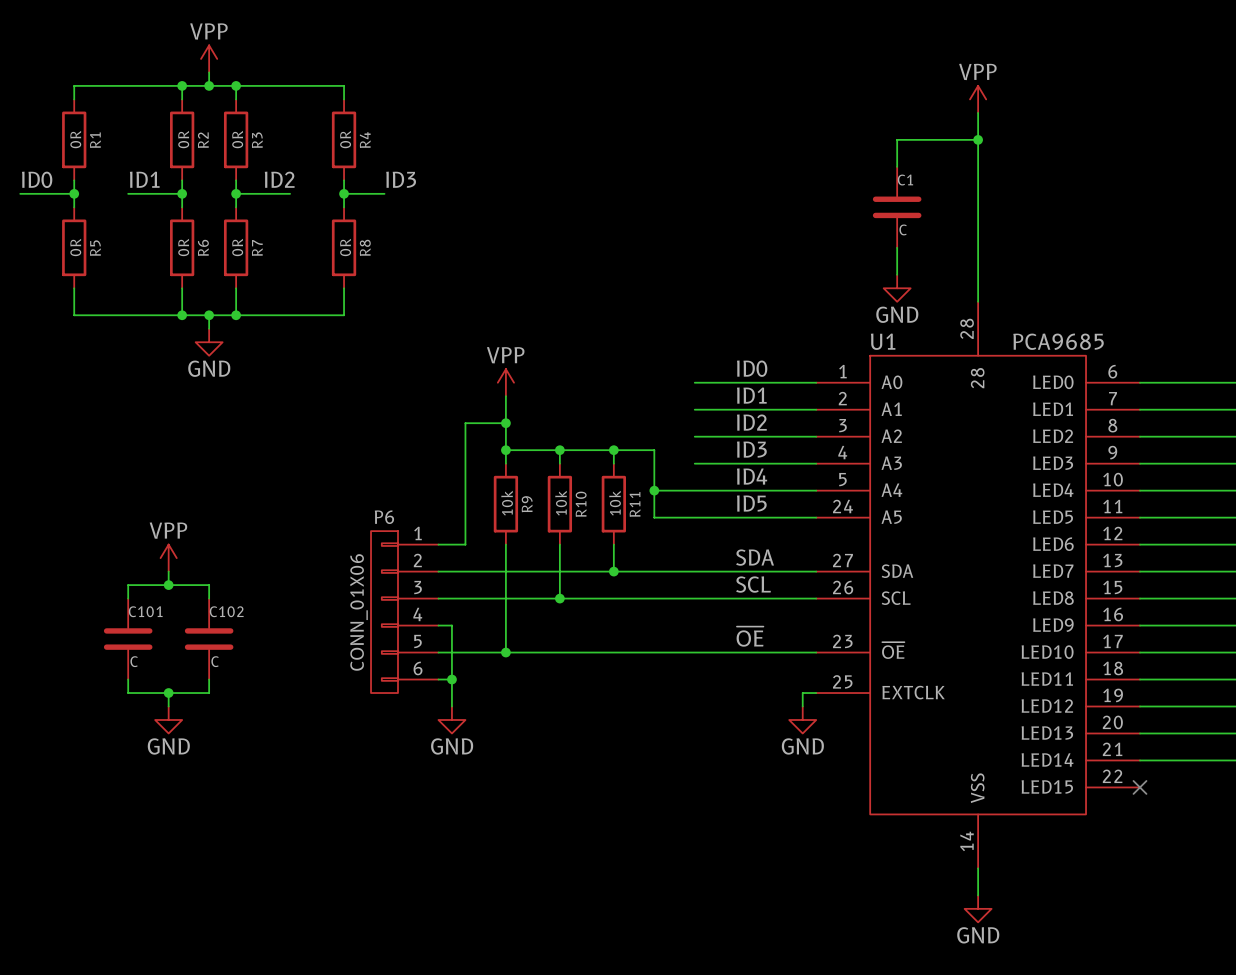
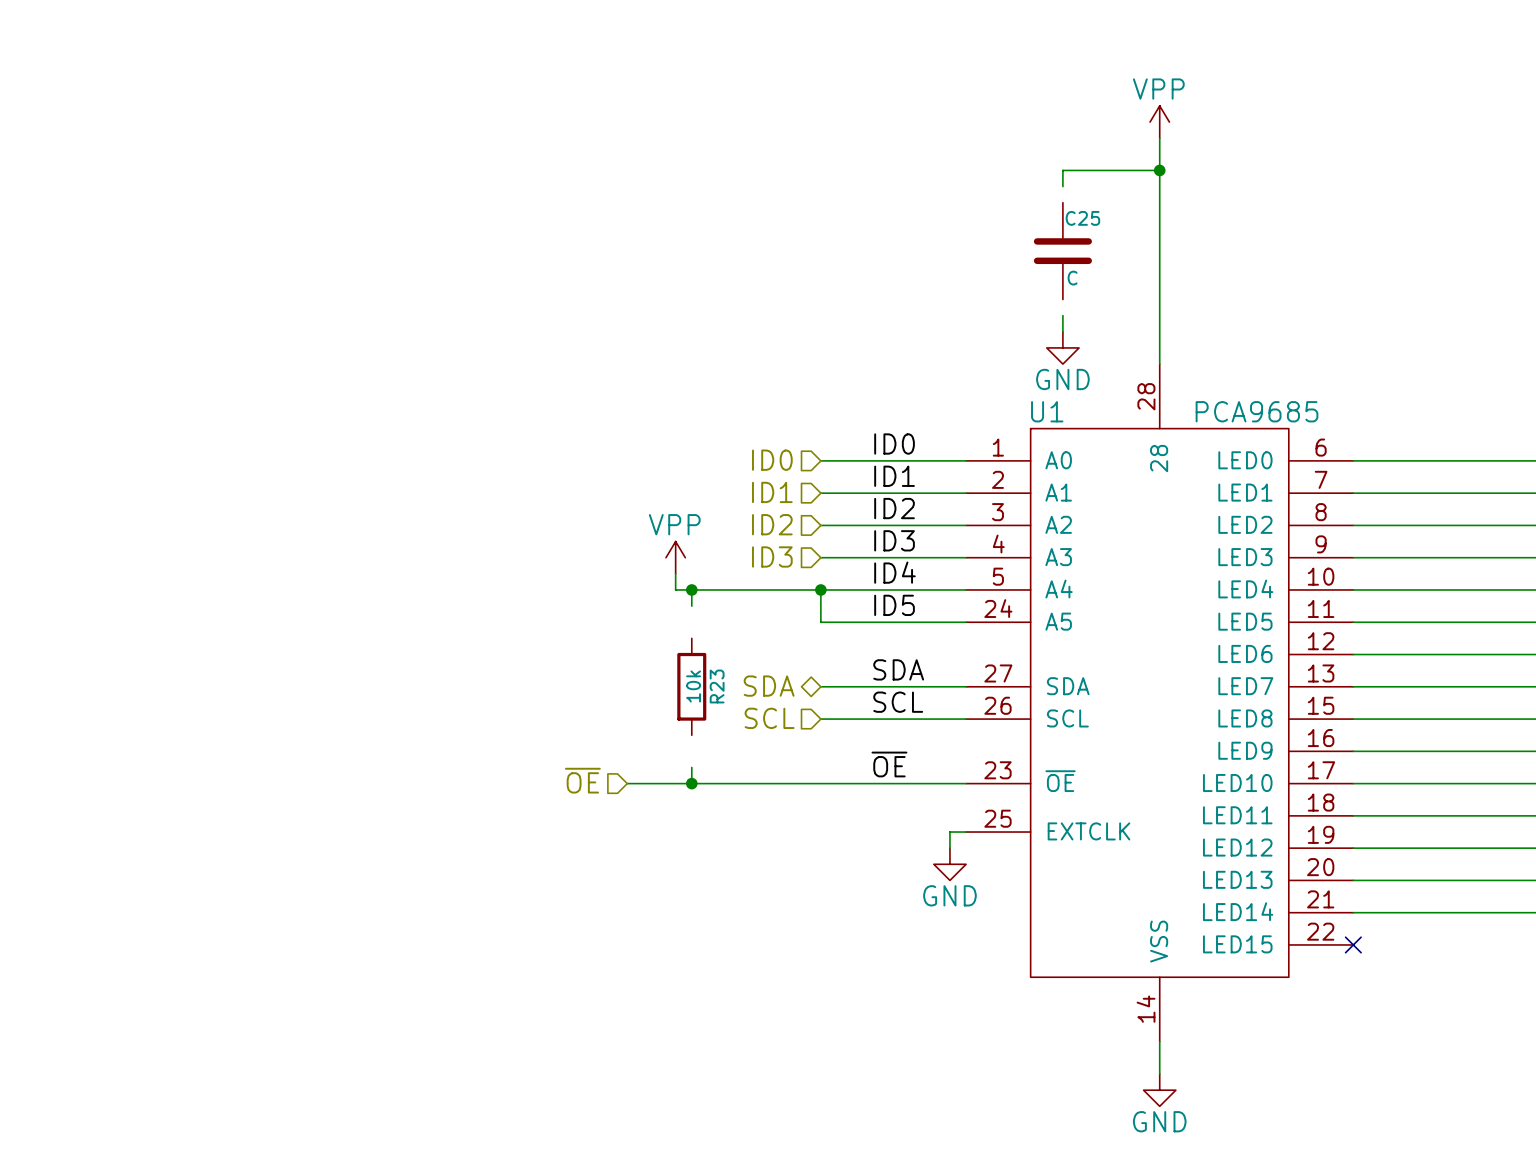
power symbol: VPP (209, 58) -> none
wire: (209, 72) (209, 85) -> none
wire: (182, 85) (182, 99) -> none
junction: (182, 85) -> none
junction: (209, 85) -> none
wire: (236, 85) (236, 99) -> none
junction: (236, 85) -> none
wire: (74, 99) (74, 85) (344, 85) (344, 99) -> none
R1: 0R (74, 139) -> none
R2: 0R (182, 139) -> none
R3: 0R (236, 139) -> none
R4: 0R (344, 139) -> none
wire: (897, 153) (897, 166) -> none
label: ID0 (37, 179) -> none
label: ID1 (144, 179) -> none
label: ID2 (279, 179) -> none
label: ID3 (401, 179) -> none
wire: (74, 180) (74, 207) -> none
wire: (182, 180) (182, 207) -> none
wire: (236, 180) (236, 207) -> none
wire: (344, 180) (344, 207) -> none
C1 name: C1 (905, 180) -> C25 (1082, 218)
wire: (20, 193) (74, 193) -> none
junction: (74, 193) -> none
wire: (128, 193) (182, 193) -> none
junction: (182, 193) -> none
wire: (236, 193) (290, 193) -> none
junction: (236, 193) -> none
wire: (344, 193) (384, 193) -> none
junction: (344, 193) -> none
R5: 0R (74, 247) -> none
R6: 0R (182, 247) -> none
R7: 0R (236, 247) -> none
R8: 0R (344, 247) -> none
wire: (897, 247) (897, 261) -> none
wire: (74, 288) (74, 315) (344, 315) (344, 288) -> none
wire: (182, 288) (182, 315) -> none
wire: (236, 288) (236, 315) -> none
junction: (182, 315) -> none
wire: (209, 315) (209, 328) -> none
junction: (209, 315) -> none
junction: (236, 315) -> none
power symbol: GND (209, 342) -> none
power symbol position: VPP (505, 382) -> VPP (675, 557)
hierarchical label: none -> ID0 (772, 460)
wire: (505, 396) (505, 463) -> none
hierarchical label: none -> ID1 (772, 492)
wire: (505, 423) (465, 423) (465, 544) (438, 544) -> none
junction: (505, 423) -> none
hierarchical label: none -> ID2 (772, 524)
wire: (505, 450) (654, 450) (654, 517) (694, 517) -> (820, 589) (820, 622)
junction: (505, 450) -> none
wire: (559, 450) (559, 463) -> (691, 589) (691, 606)
junction: (559, 450) -> none
wire: (613, 450) (613, 463) -> (691, 767) (691, 783)
junction: (613, 450) -> none
hierarchical label: none -> ID3 (772, 556)
wire: none -> (675, 573) (675, 589) (772, 589)
junction: none -> (691, 589)
junction: (654, 490) -> none
junction: none -> (820, 589)
R9: 10k (505, 504) -> none
R10: 10k (559, 504) -> none
R11: 10k (613, 504) -> none
wire: (505, 544) (505, 652) -> none
wire: (559, 544) (559, 598) -> none
wire: (613, 544) (613, 571) -> none
power symbol: VPP (168, 558) -> none
wire: (168, 571) (168, 585) -> none
wire: (438, 571) (694, 571) -> none
R23: none -> 10k (691, 686)
junction: (613, 571) -> none
hierarchical label: none -> SDA (769, 686)
junction: (168, 585) -> none
wire: (128, 598) (128, 585) (209, 585) (209, 598) -> none
wire: (438, 598) (694, 598) -> none
junction: (559, 598) -> none
hierarchical label: none -> SCL (769, 718)
P6: CONN_01X06 (404, 612) -> none
wire: (438, 625) (451, 625) (451, 706) -> none
C101: C (128, 639) -> none
C102: C (209, 639) -> none
hierarchical label: none -> ~{OE} (582, 780)
wire: (438, 652) (532, 652) -> none
junction: (505, 652) -> none
junction: none -> (691, 783)
wire: (128, 679) (128, 693) (209, 693) (209, 679) -> none
wire: (438, 679) (451, 679) -> none
junction: (451, 679) -> none
wire: (168, 693) (168, 706) -> none
junction: (168, 693) -> none
power symbol: GND (168, 719) -> none
power symbol: GND (451, 719) -> none

